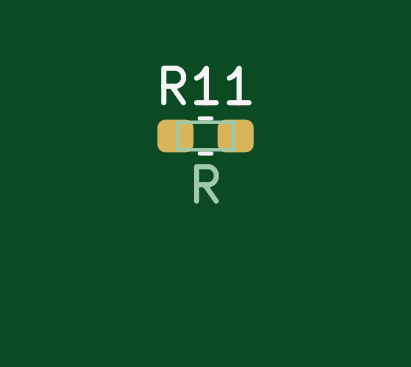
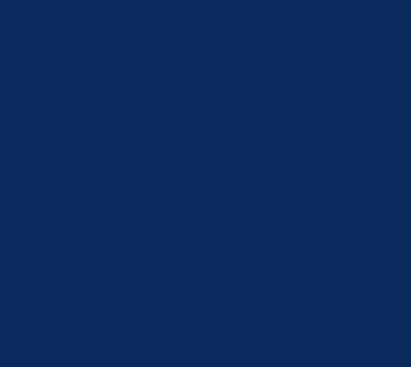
R11: R (205, 135) -> none

